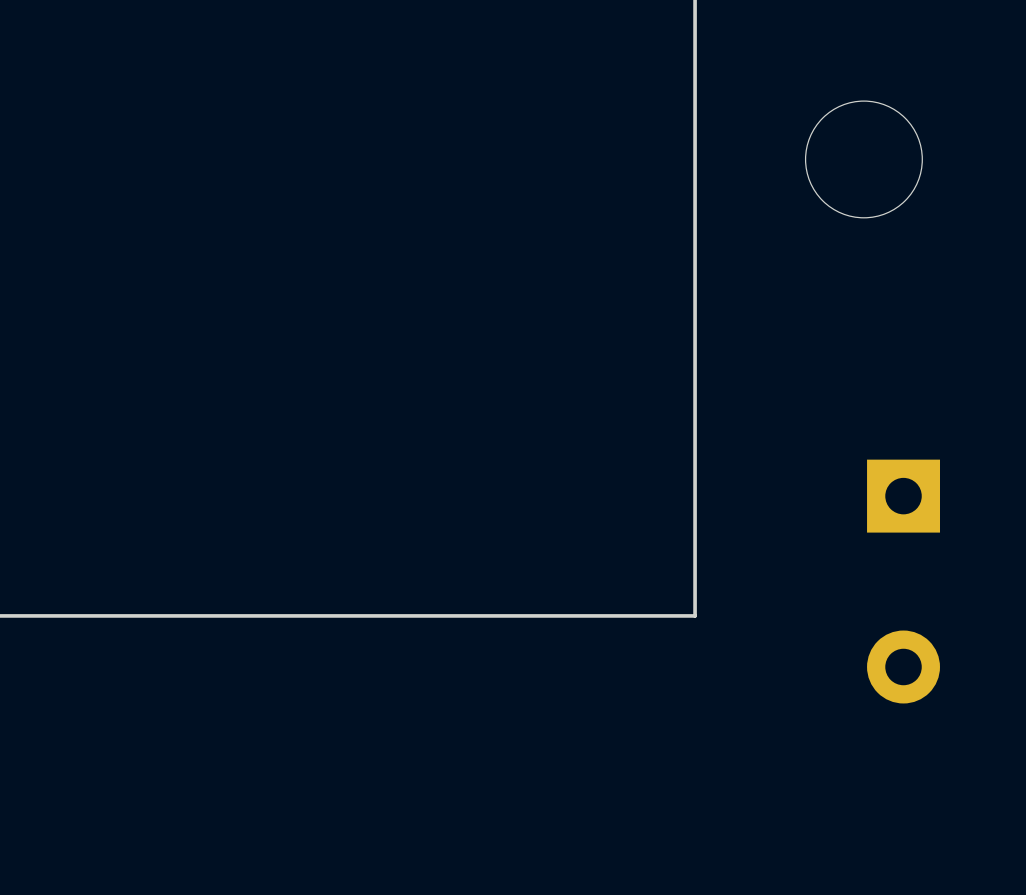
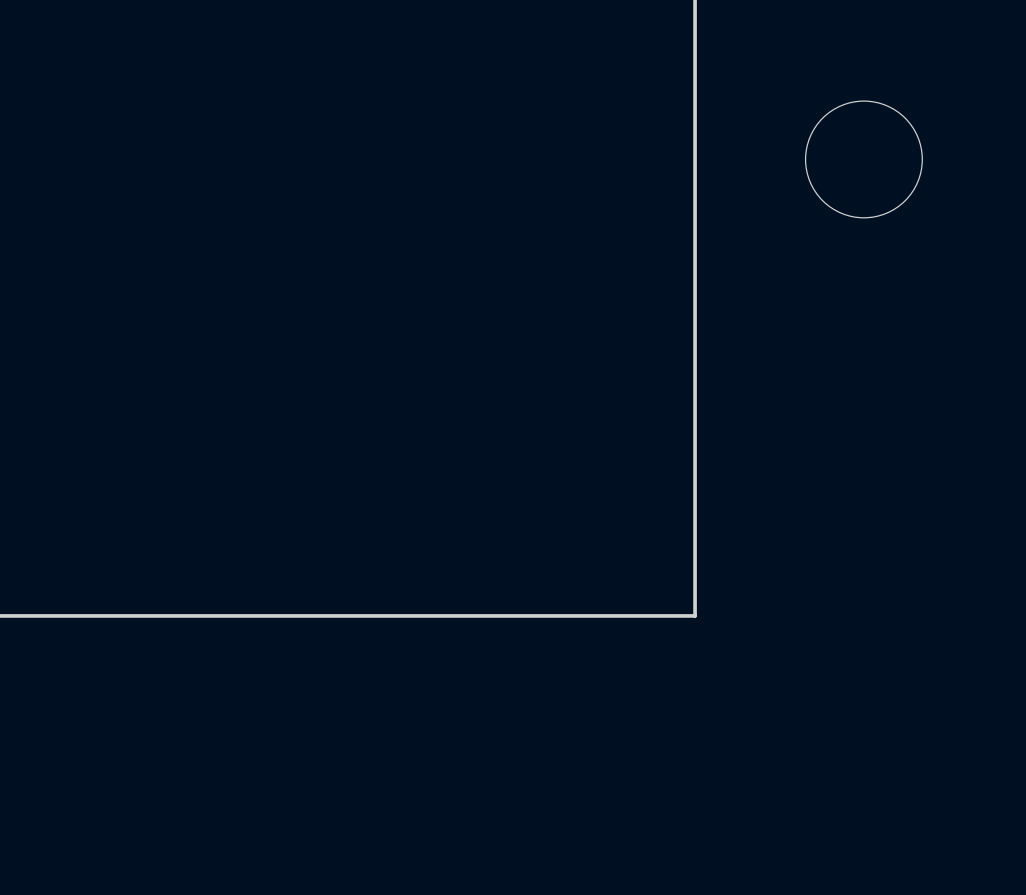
part: (903, 496) -> none
part: (903, 667) -> none

